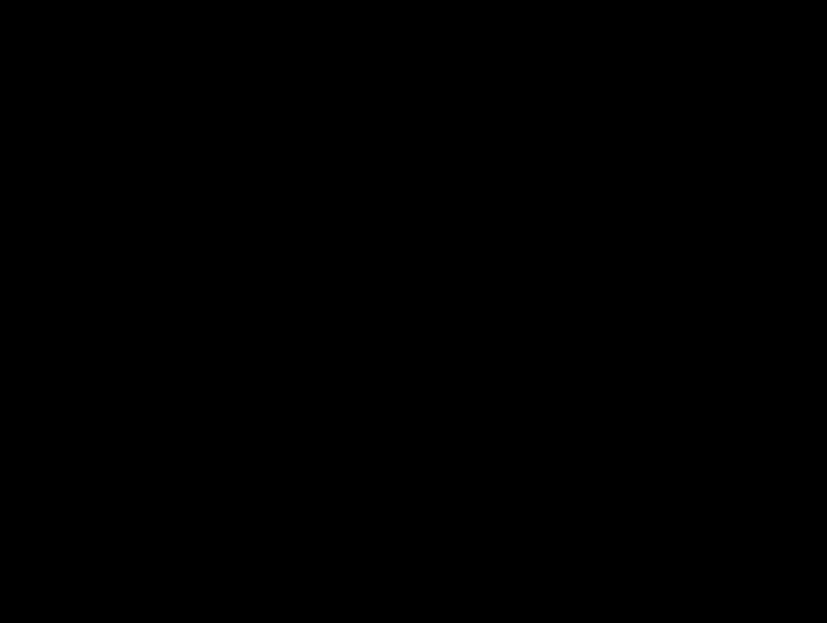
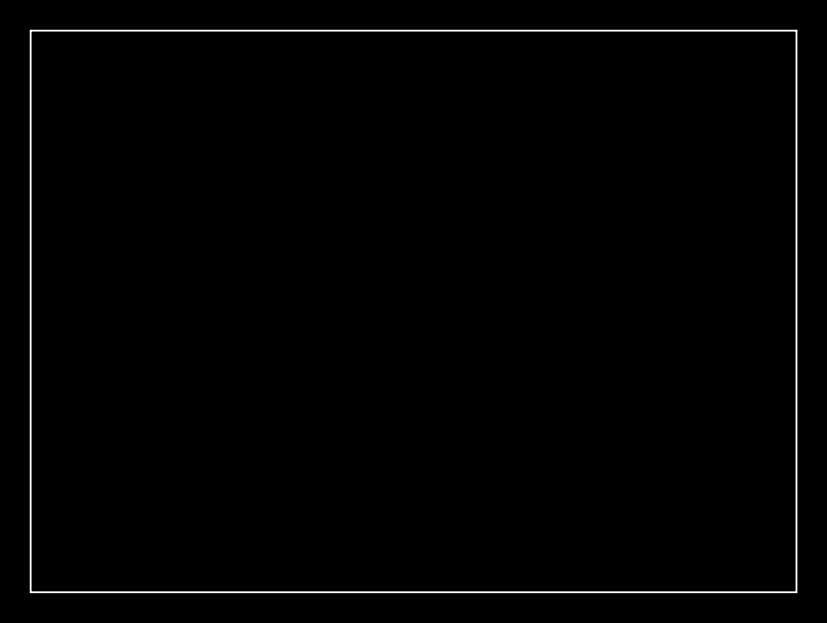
board edge: none -> (796, 30) (30, 30) (30, 592) (796, 592) (796, 30)

